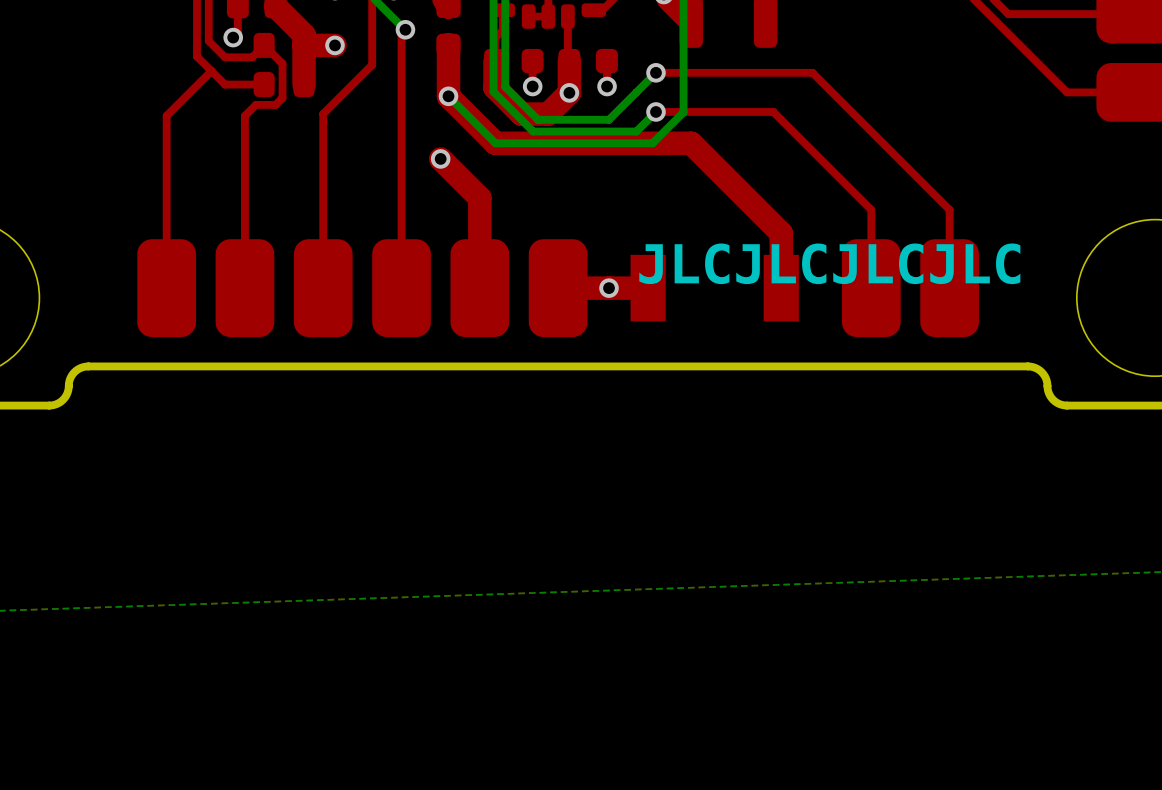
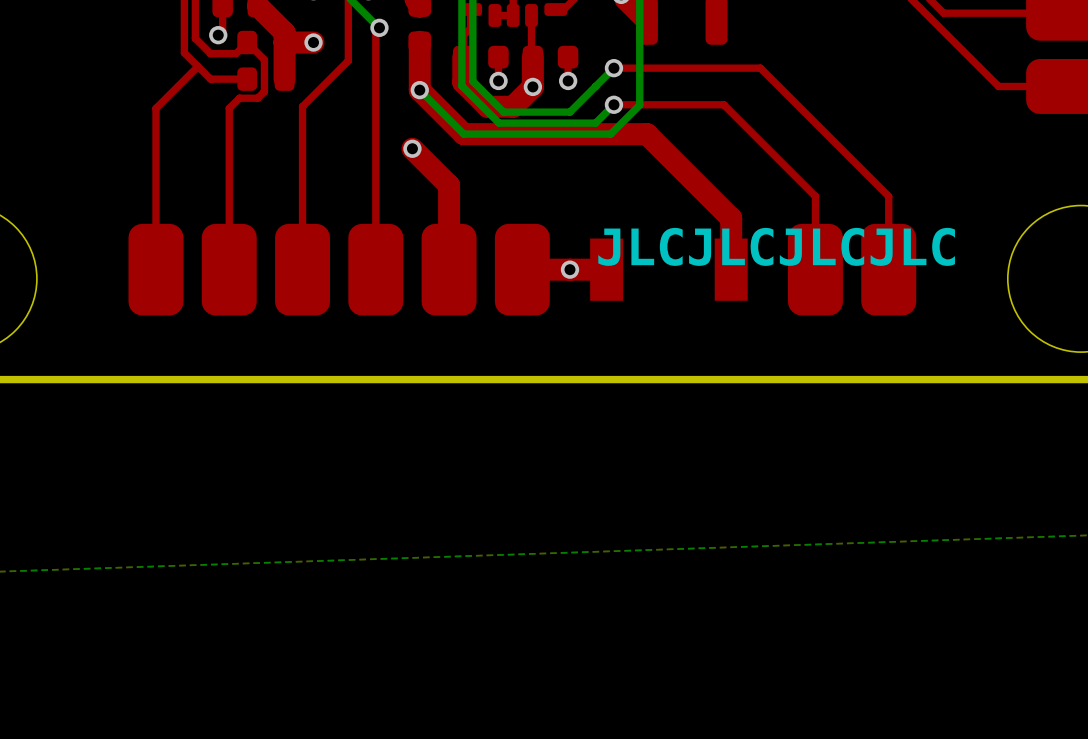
board edge: (1067, 405) (1053, 399) (1048, 392) (1043, 374) (1035, 367) (1027, 366) (88, 366) (80, 367) (72, 374) (67, 392) (63, 399) (49, 405) -> (998, 379) (46, 379)

